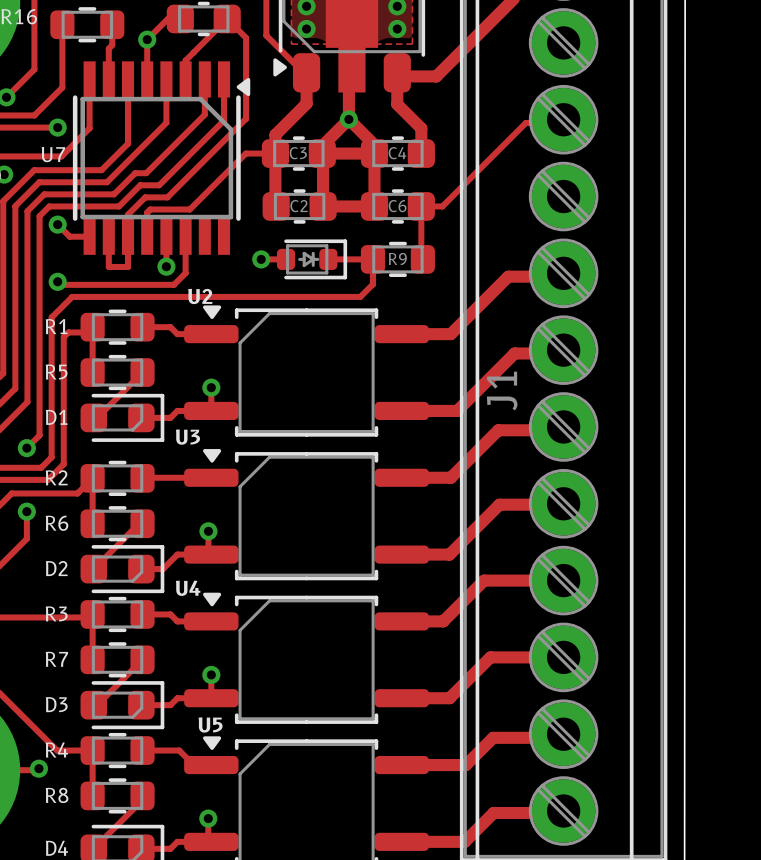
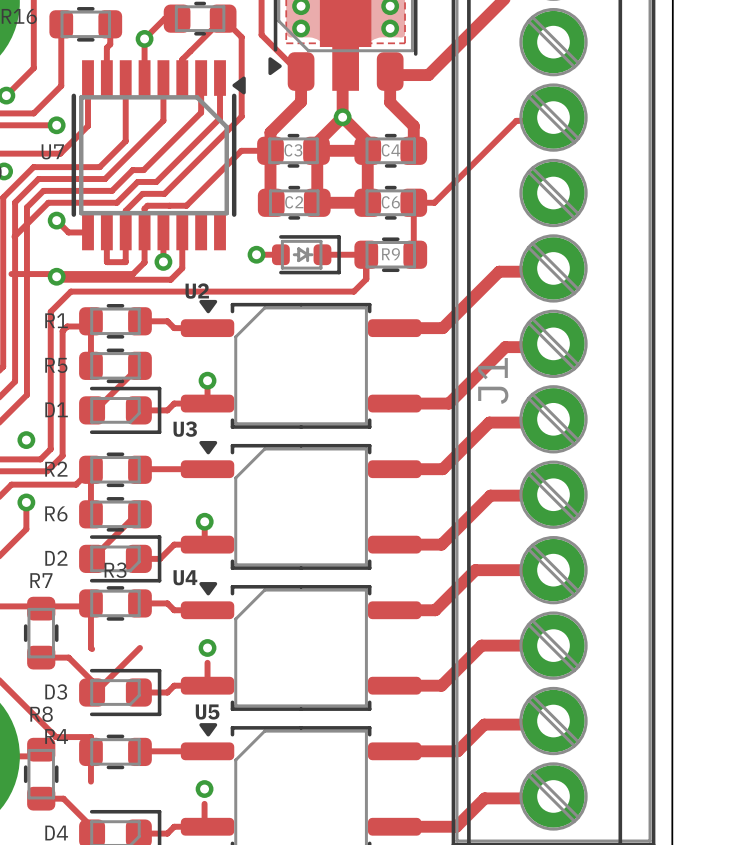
track: (39, 216) (39, 435) (26, 448) -> (38, 212) (14, 236)
track: none -> (144, 232) (144, 262) (133, 274) (11, 274)
R3 name position: R3 (56, 613) -> R3 (115, 570)
R7 rotation: 0° (117, 659) -> 90° clockwise (41, 633)
R7 position: (117, 659) -> (41, 633)
track: none -> (41, 657) (68, 657) (92, 681) (92, 685)
via position: (211, 674) -> (207, 647)
R4 position: (117, 750) -> (115, 751)
track: (142, 750) (179, 750) (193, 765) -> (139, 751) (190, 751)
via: (38, 768) -> none
R8 rotation: 0° (117, 795) -> 90° clockwise (41, 774)
R8 position: (117, 795) -> (41, 774)
track: (142, 795) (142, 800) (93, 848) -> none
track: none -> (41, 798) (63, 798) (90, 826)
via position: (208, 818) -> (204, 789)

